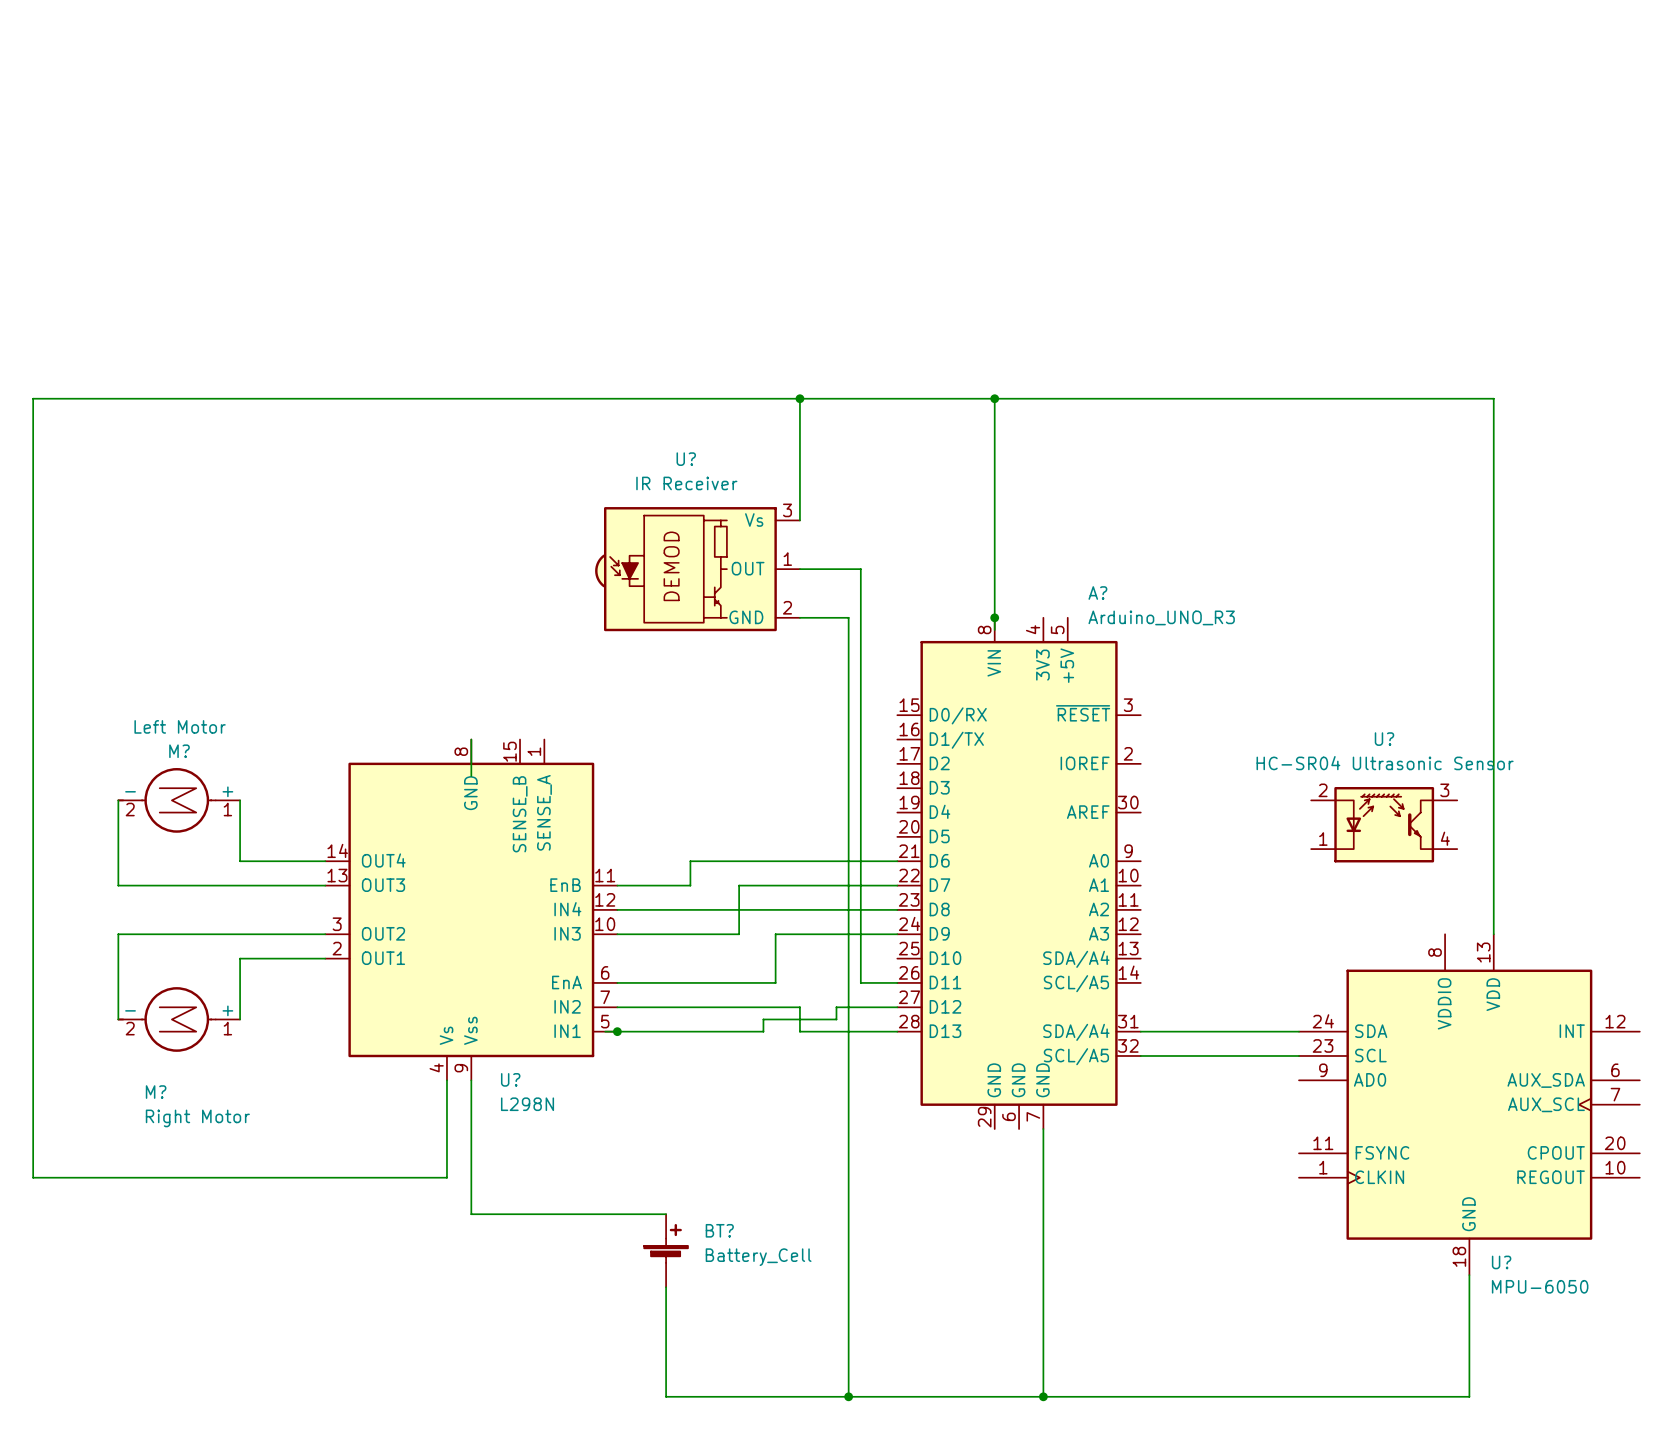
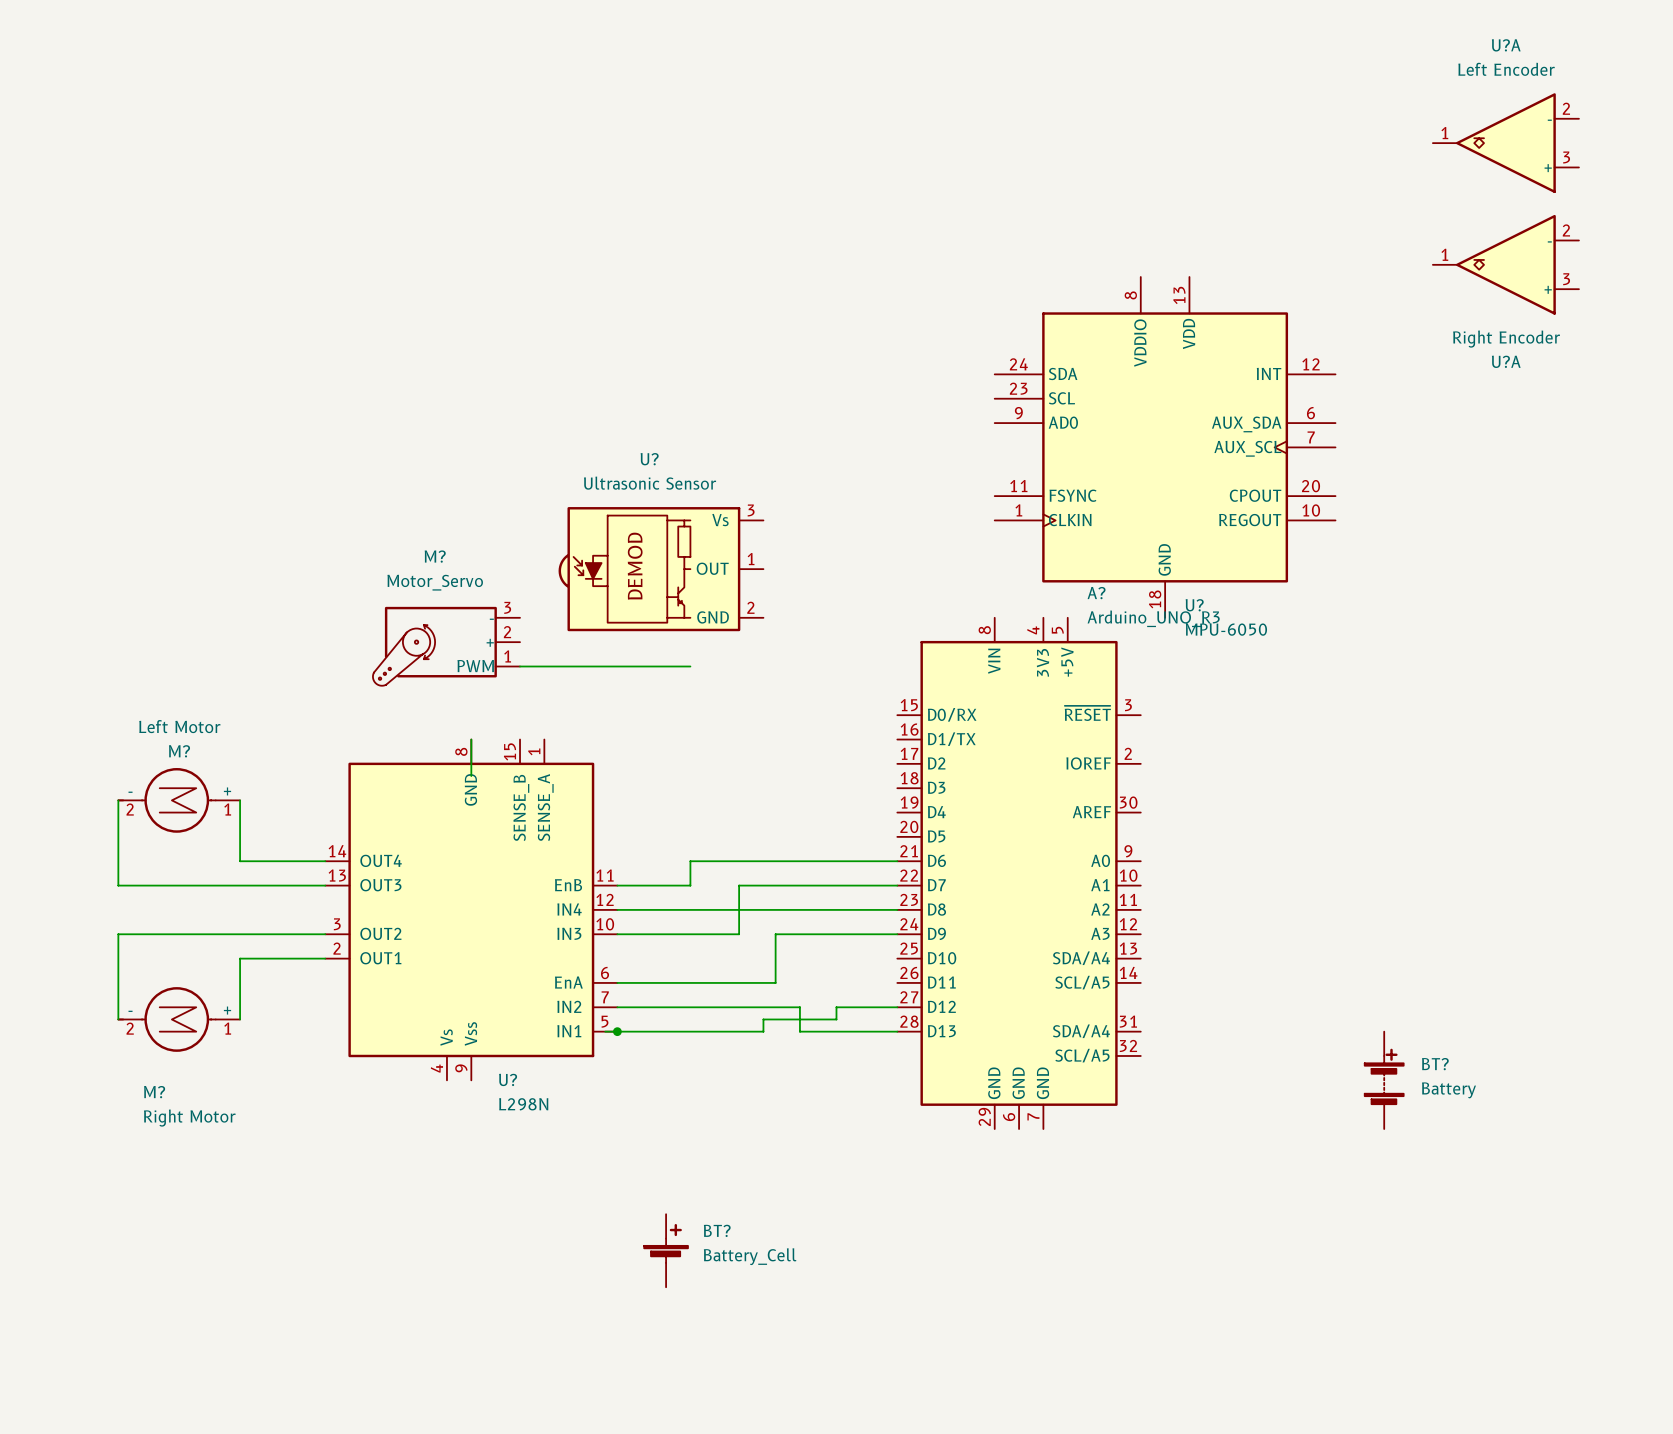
U?A: none -> Left Encoder (1505, 143)
U?A: none -> Right Encoder (1505, 264)
wire: (799, 398) (799, 520) -> none
junction: (799, 398) -> none
wire: (994, 398) (994, 629) -> none
junction: (994, 398) -> none
U?: none -> MPU-6050 (1165, 447)
U?: none -> Ultrasonic Sensor (661, 569)
U?: IR Receiver (697, 569) -> none
wire: (799, 569) (860, 569) (860, 982) (897, 982) -> none
wire: (799, 617) (848, 617) (848, 1396) -> none
junction: (994, 617) -> none
M?: none -> Motor_Servo (446, 646)
wire: none -> (520, 666) (690, 666)
U?: HC-SR04 Ultrasonic Sensor (1384, 824) -> none
wire: (1493, 934) (1493, 398) (33, 398) (33, 1177) (446, 1177) (446, 1080) -> none
wire: (1140, 1031) (1299, 1031) -> none
wire: (1140, 1055) (1299, 1055) -> none
wire: (471, 1080) (471, 1214) (666, 1214) -> none
BT?: none -> Battery (1384, 1080)
U?: MPU-6050 (1469, 1104) -> none
wire: (1043, 1129) (1043, 1396) -> none
wire: (1469, 1275) (1469, 1396) (666, 1396) (666, 1287) -> none
junction: (848, 1396) -> none
junction: (1043, 1396) -> none

